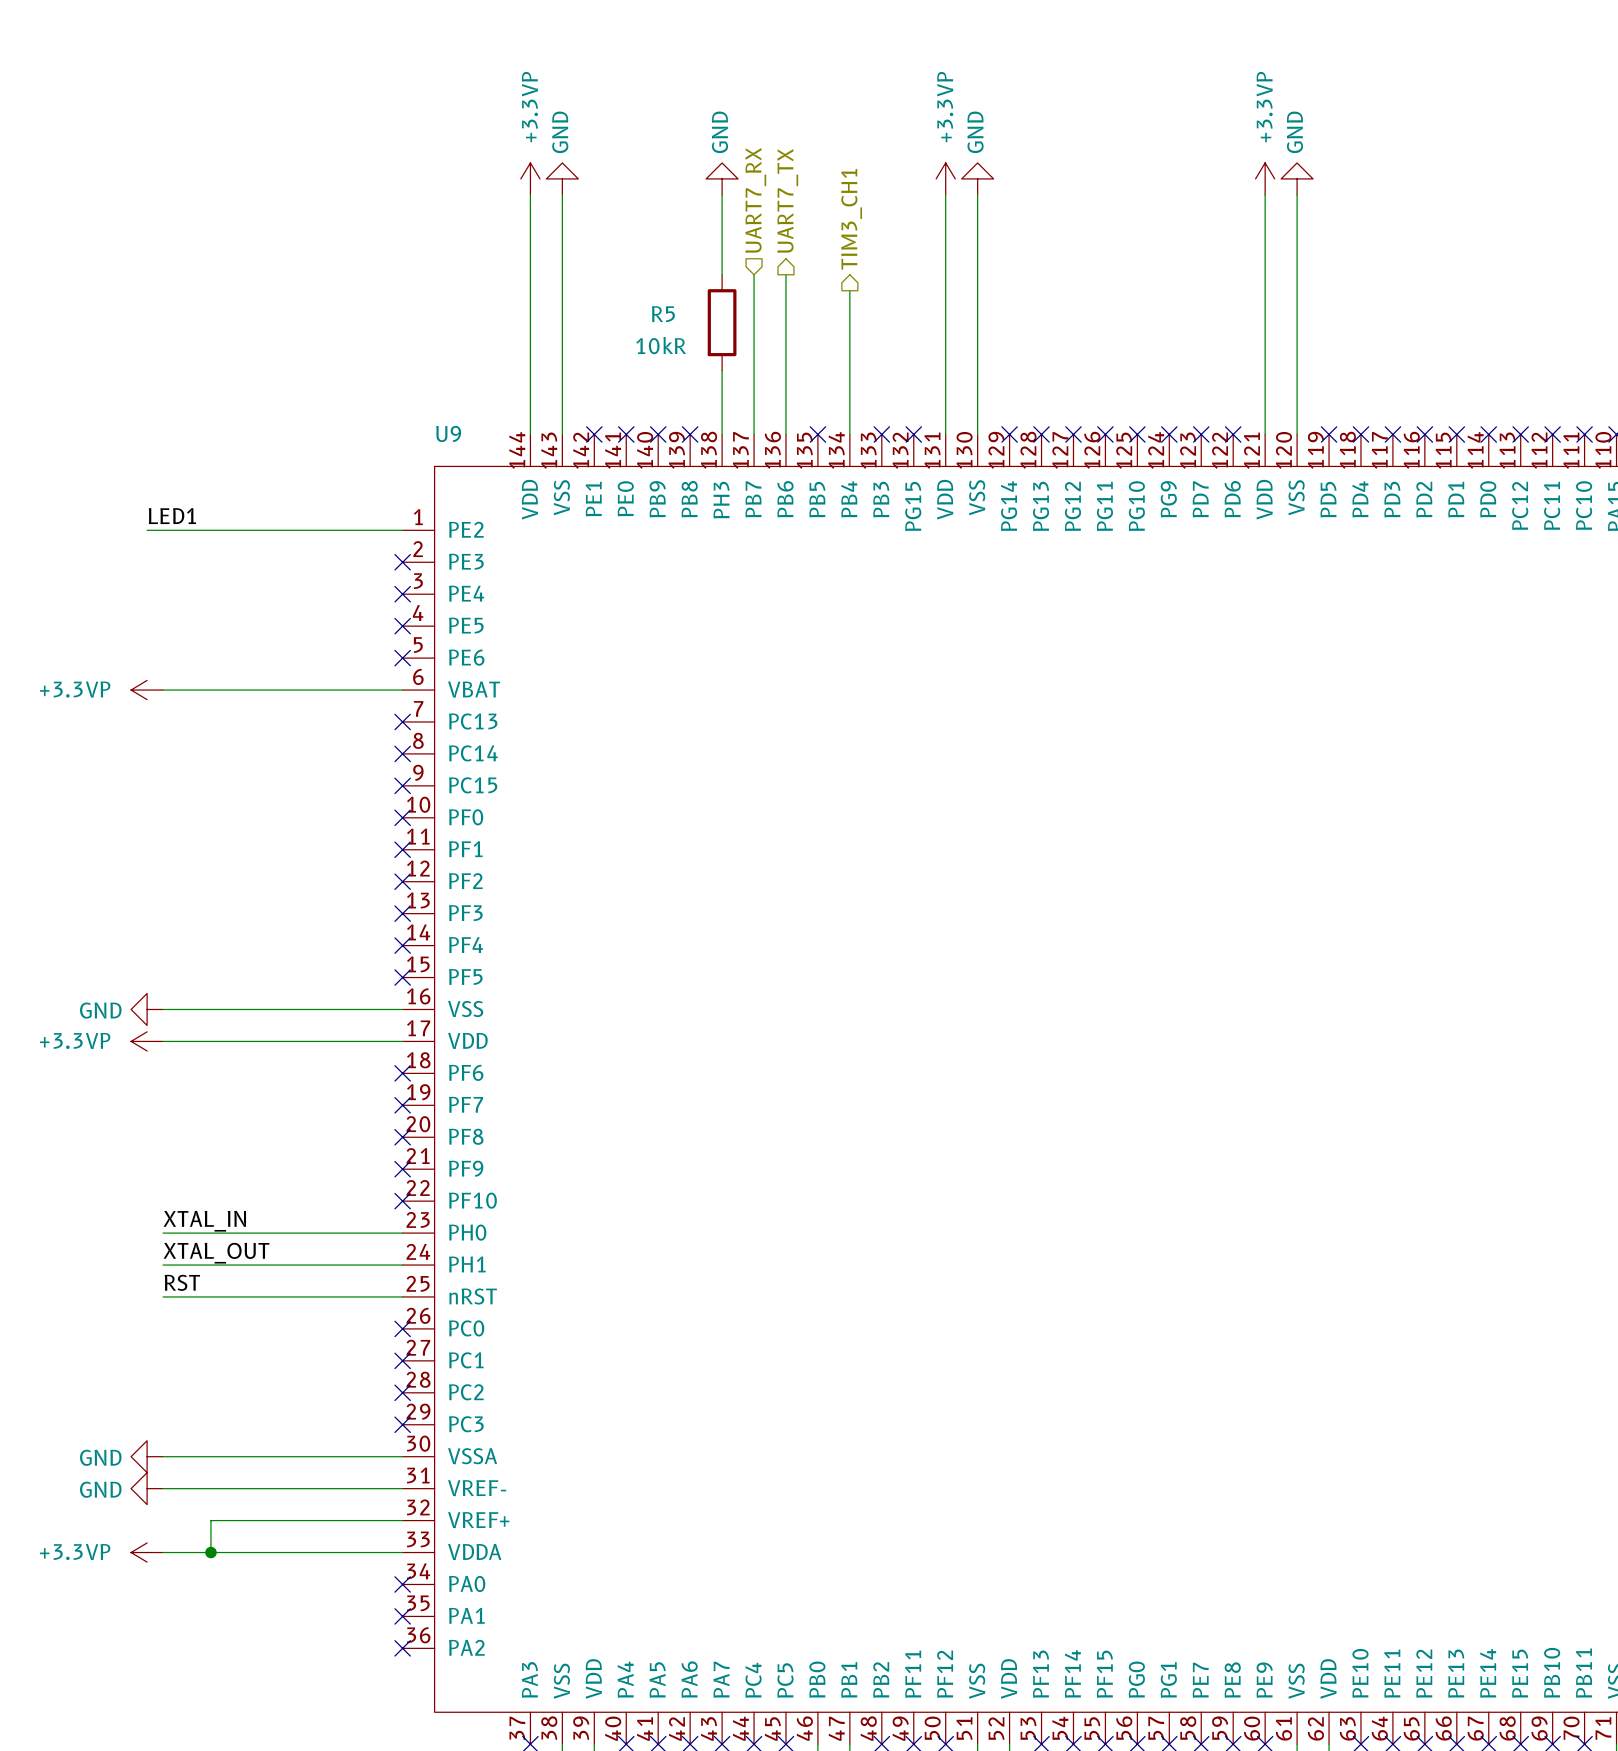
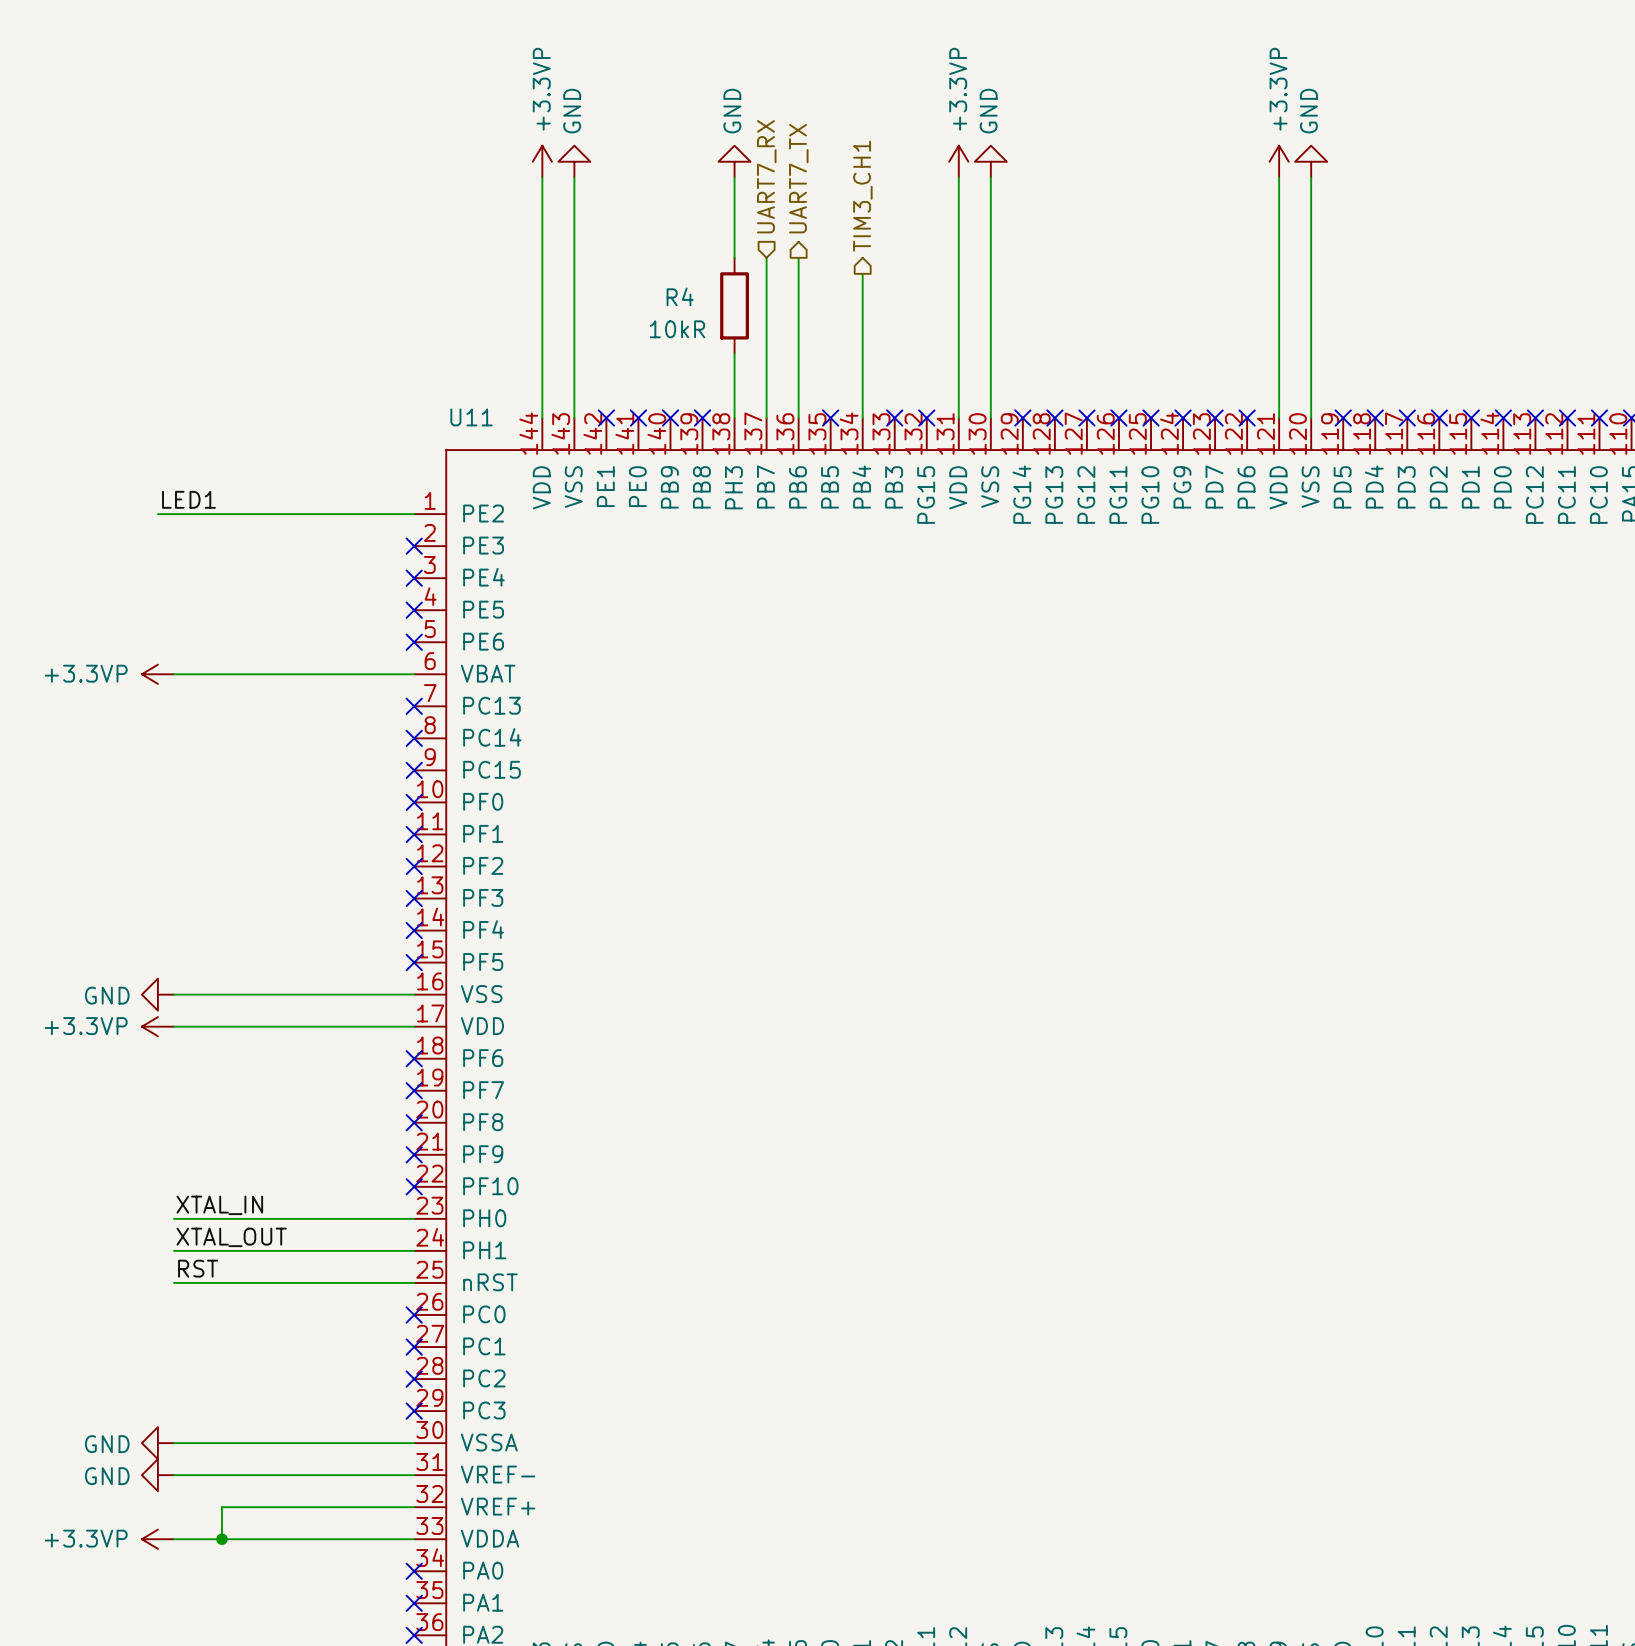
R5 name: R5 (663, 314) -> R4 (680, 296)
U9 name: U9 (448, 433) -> U11 (471, 417)

